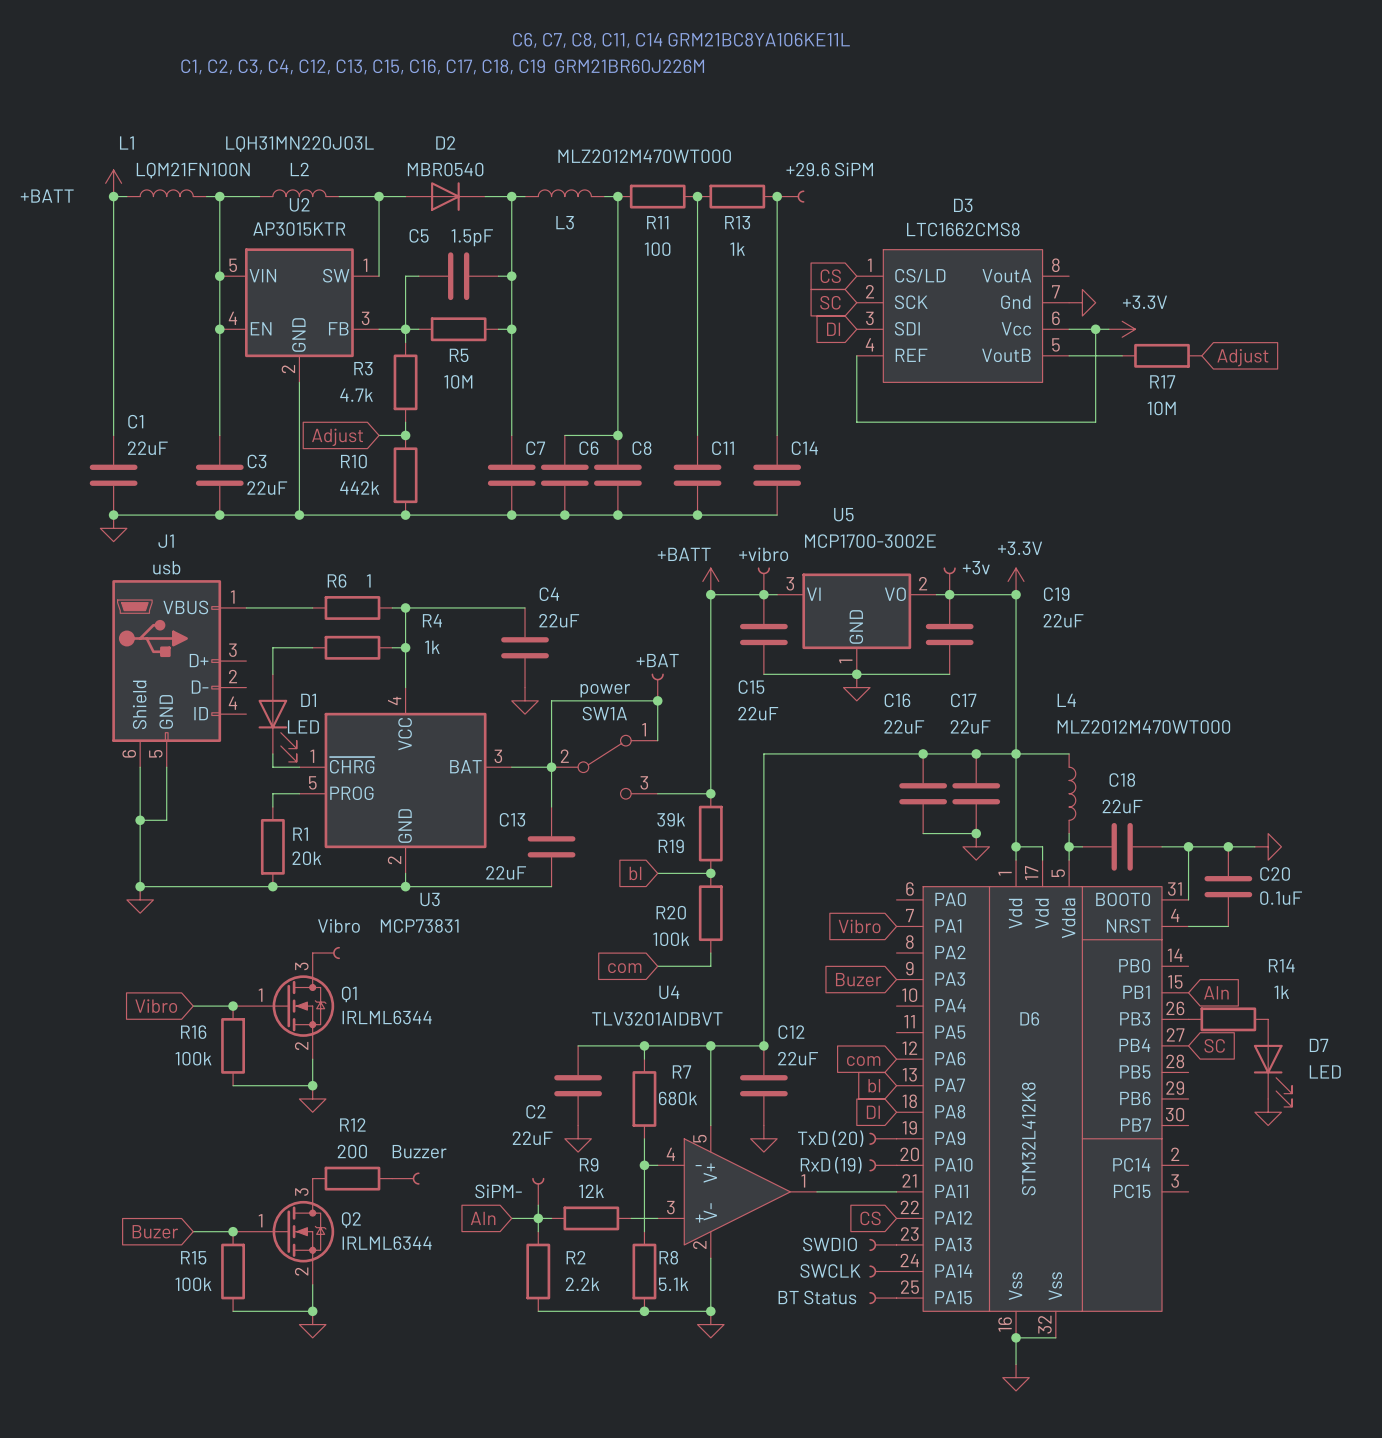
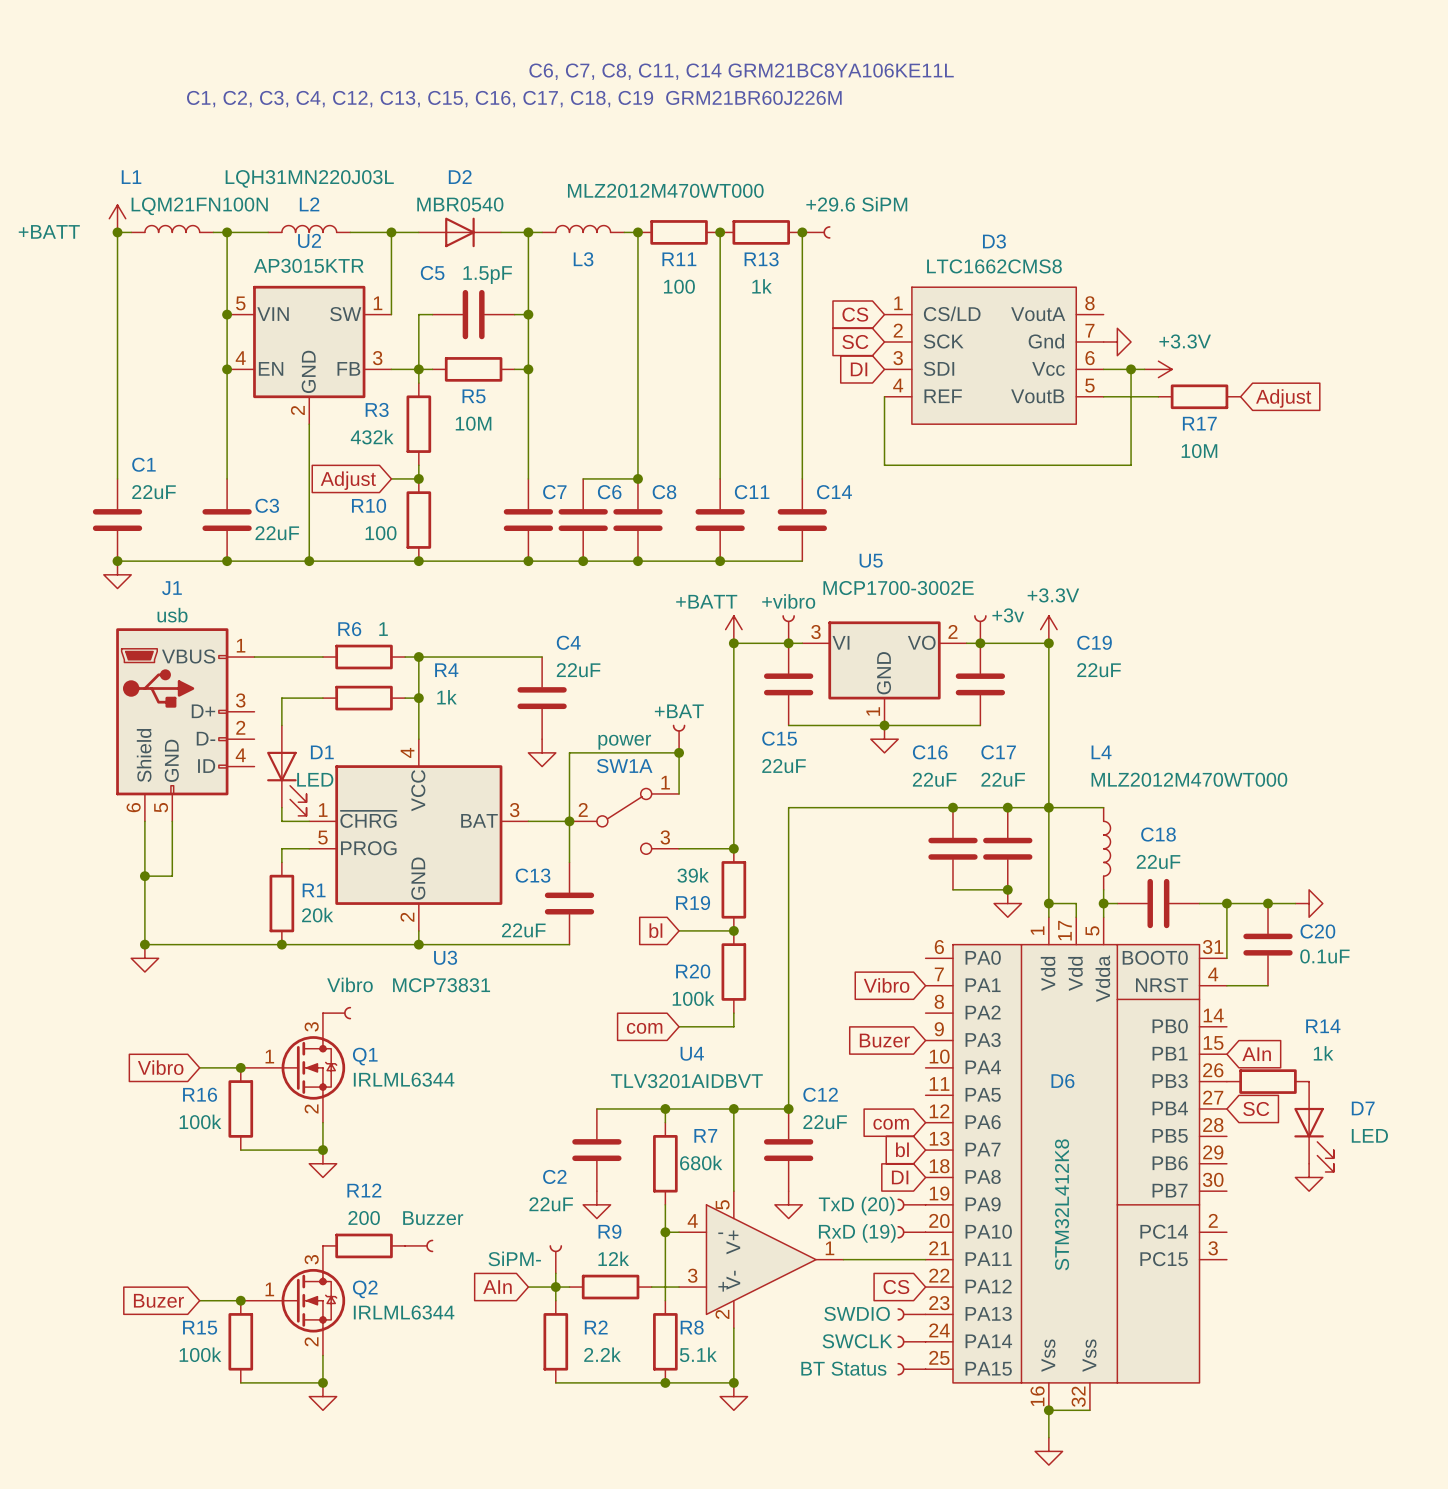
R3 value: 4.7k (356, 395) -> 432k (372, 437)
R10 value: 442k (359, 487) -> 100 (381, 533)

